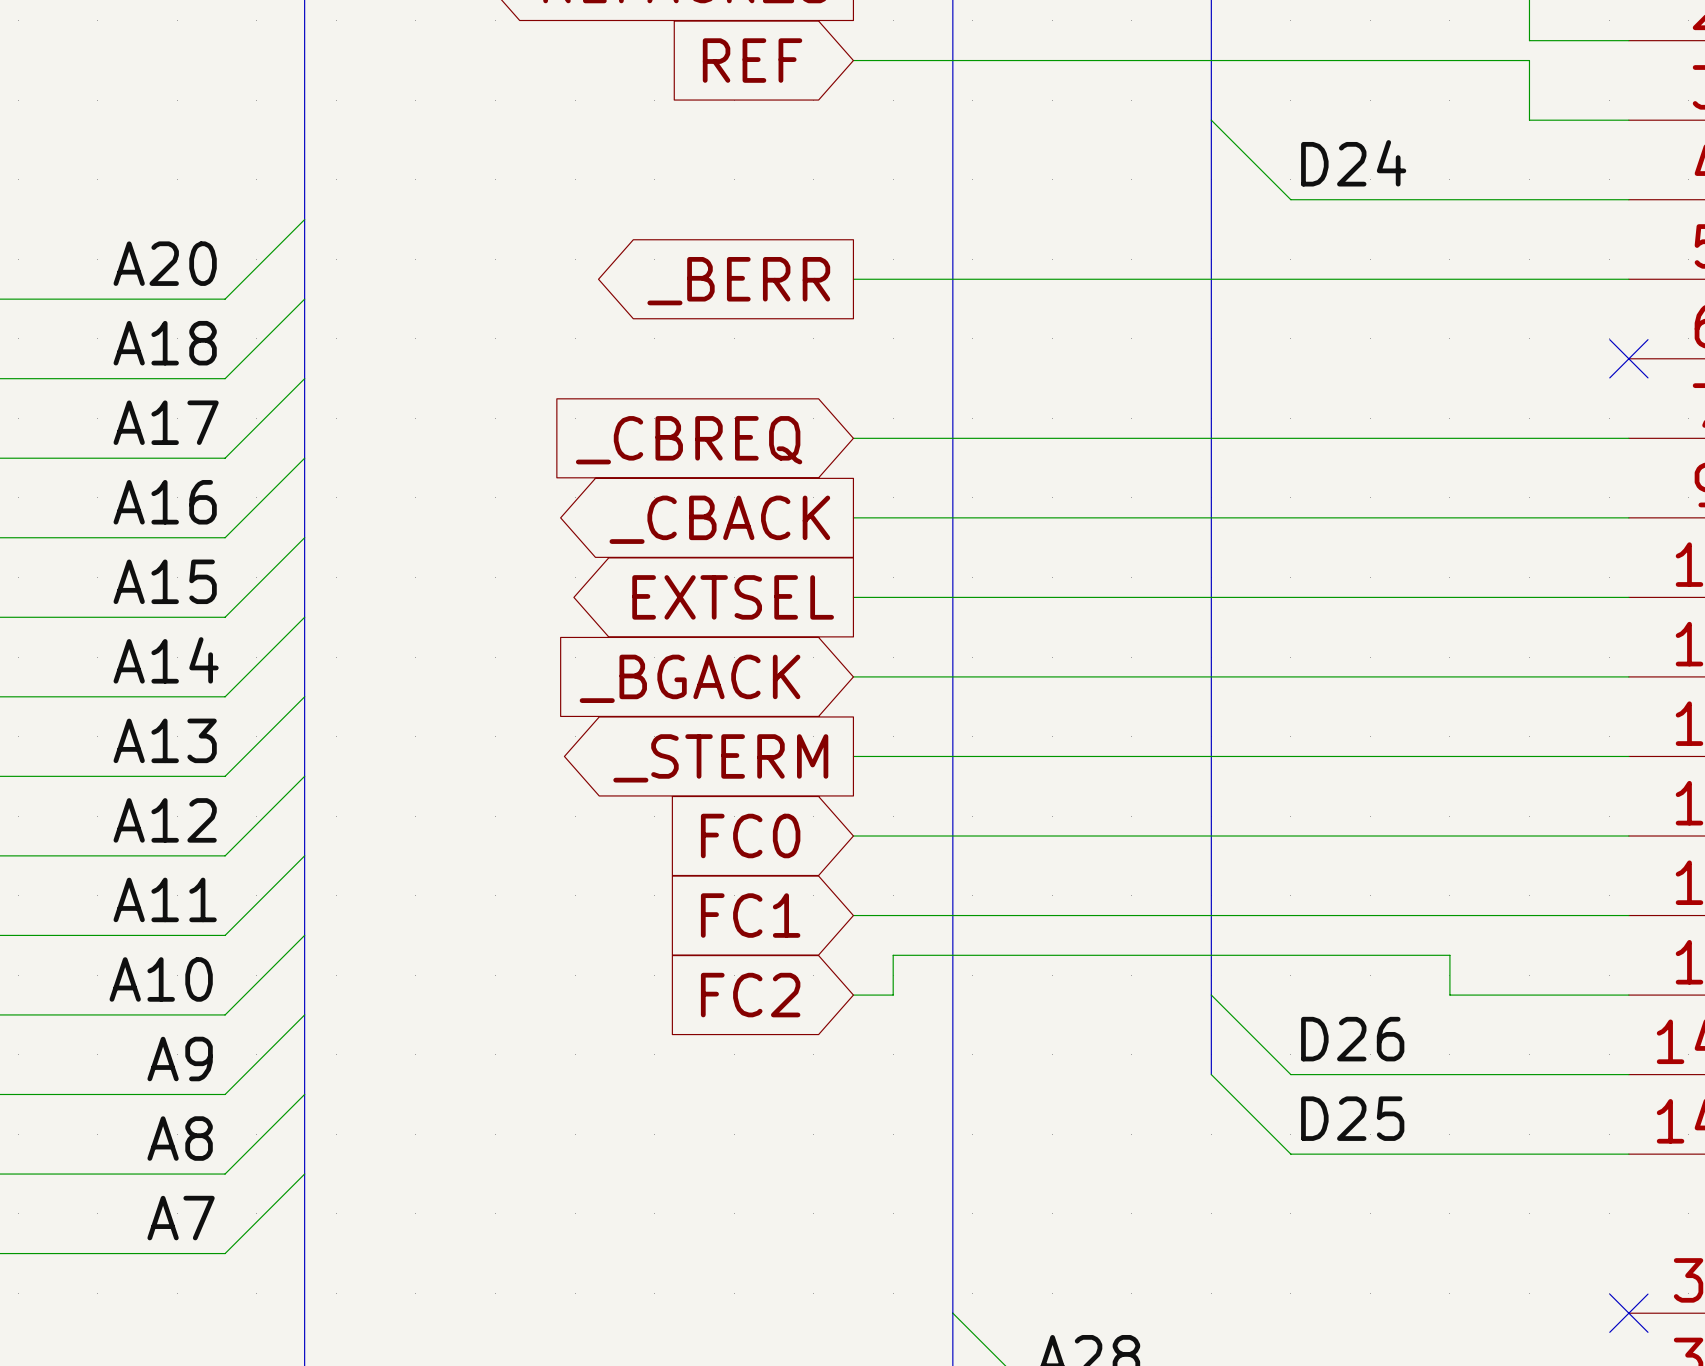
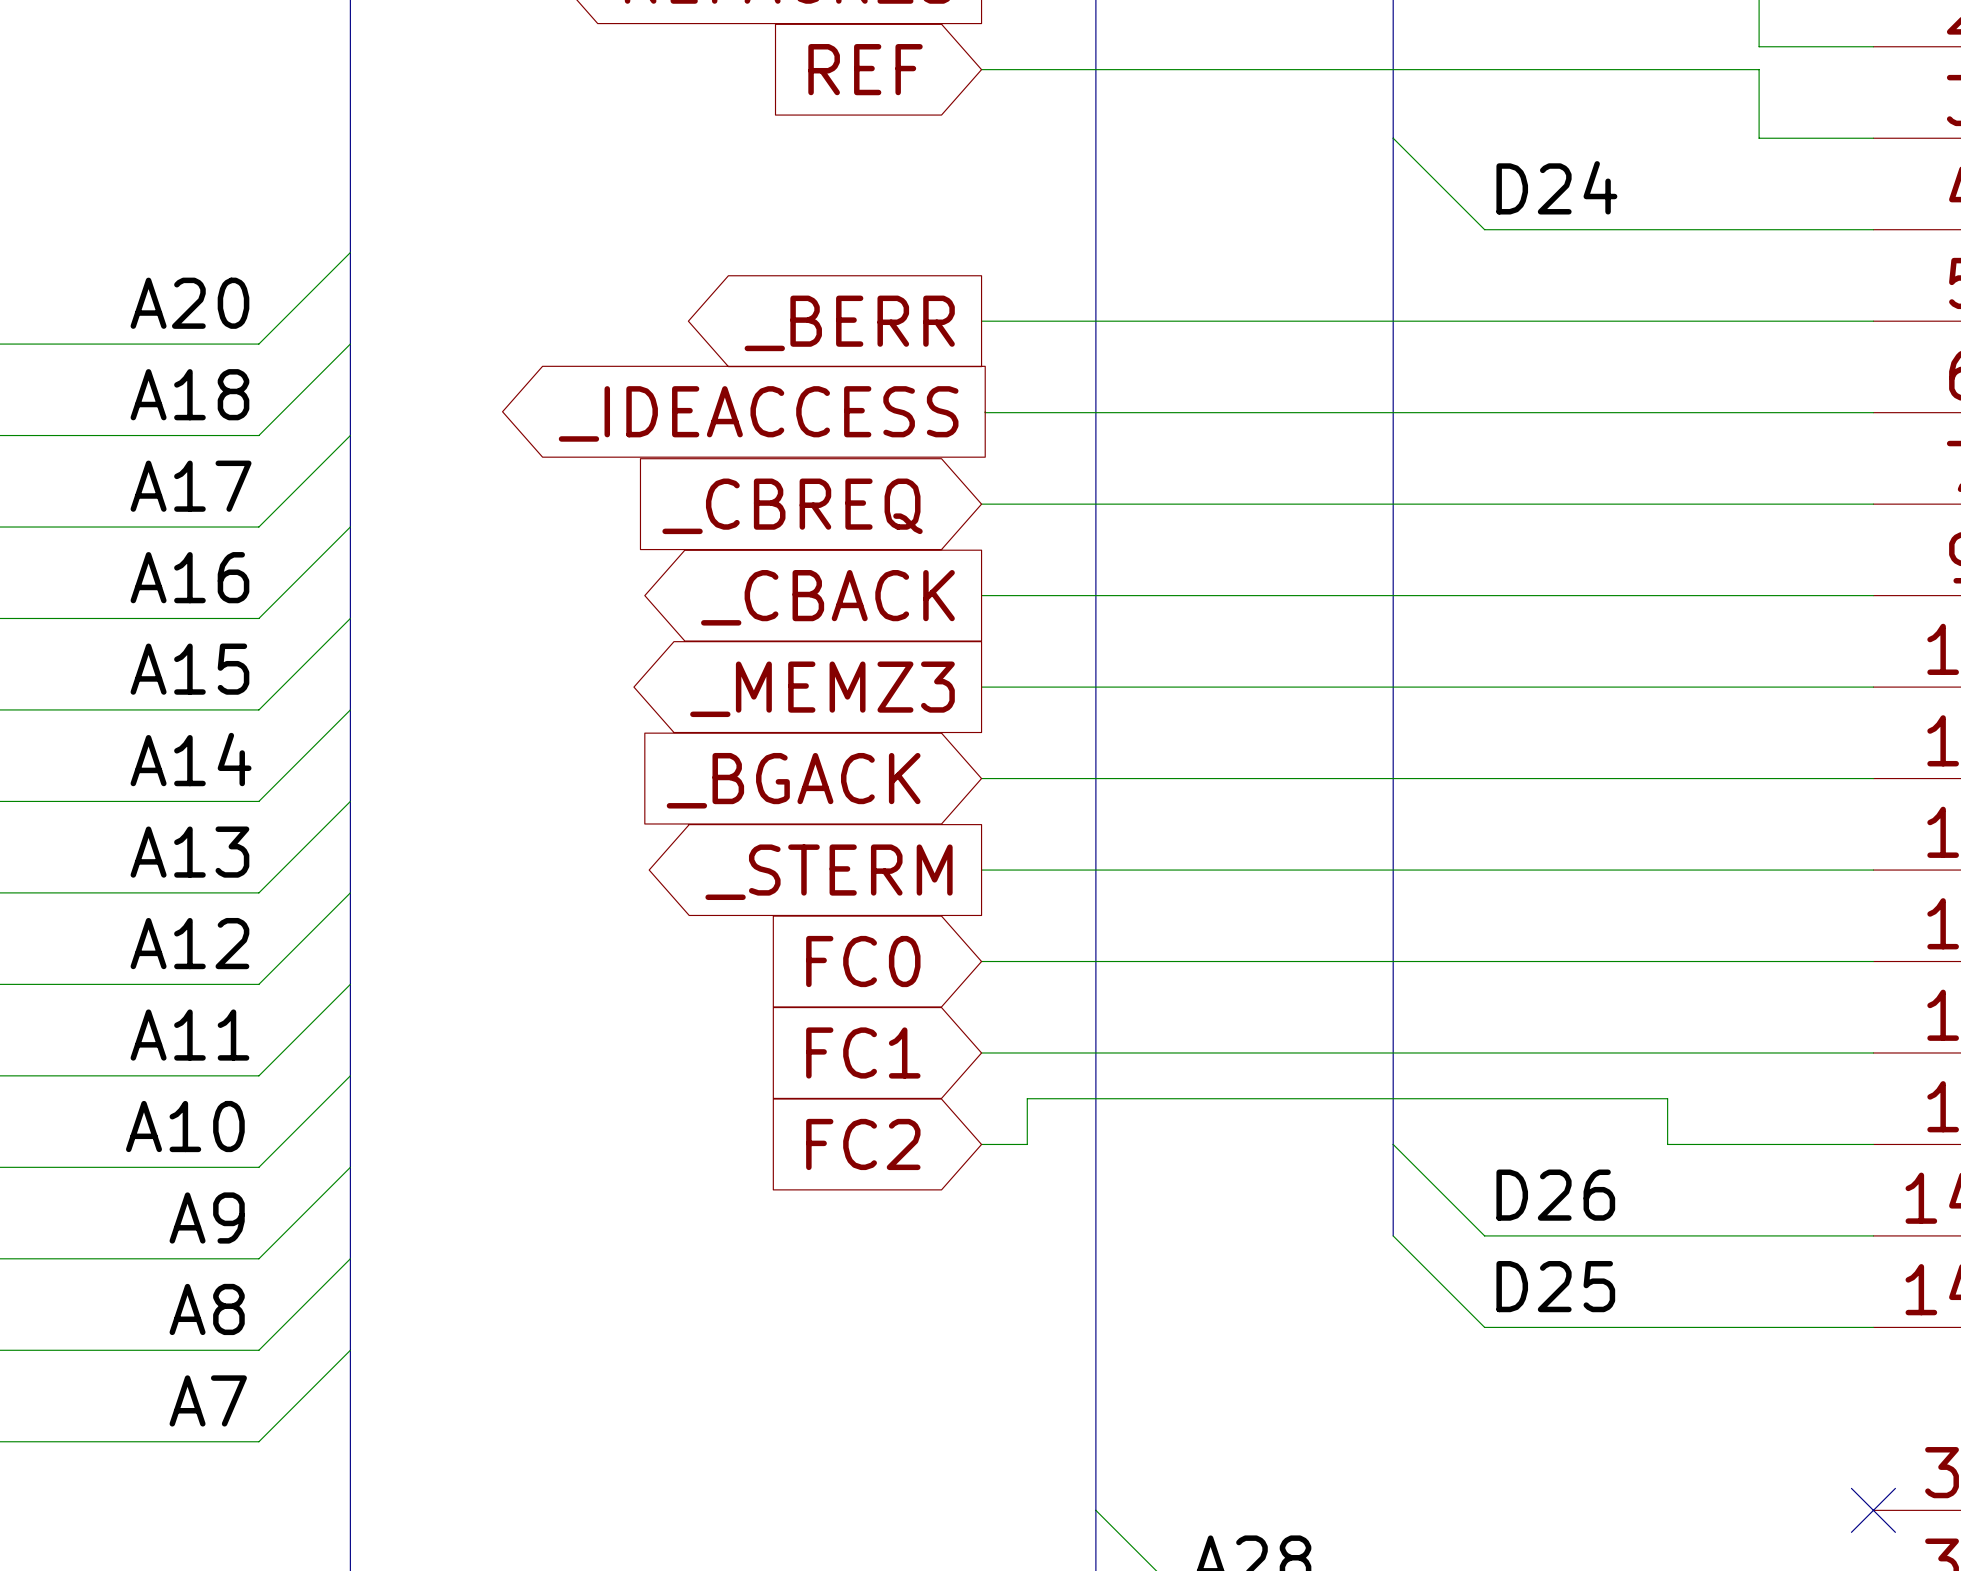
wire: none -> (985, 411) (1873, 412)
no-connect mark: (1628, 358) -> none
global label: none -> _IDEACCESS (758, 413)
global label: EXTSEL (733, 597) -> _MEMZ3 (822, 689)

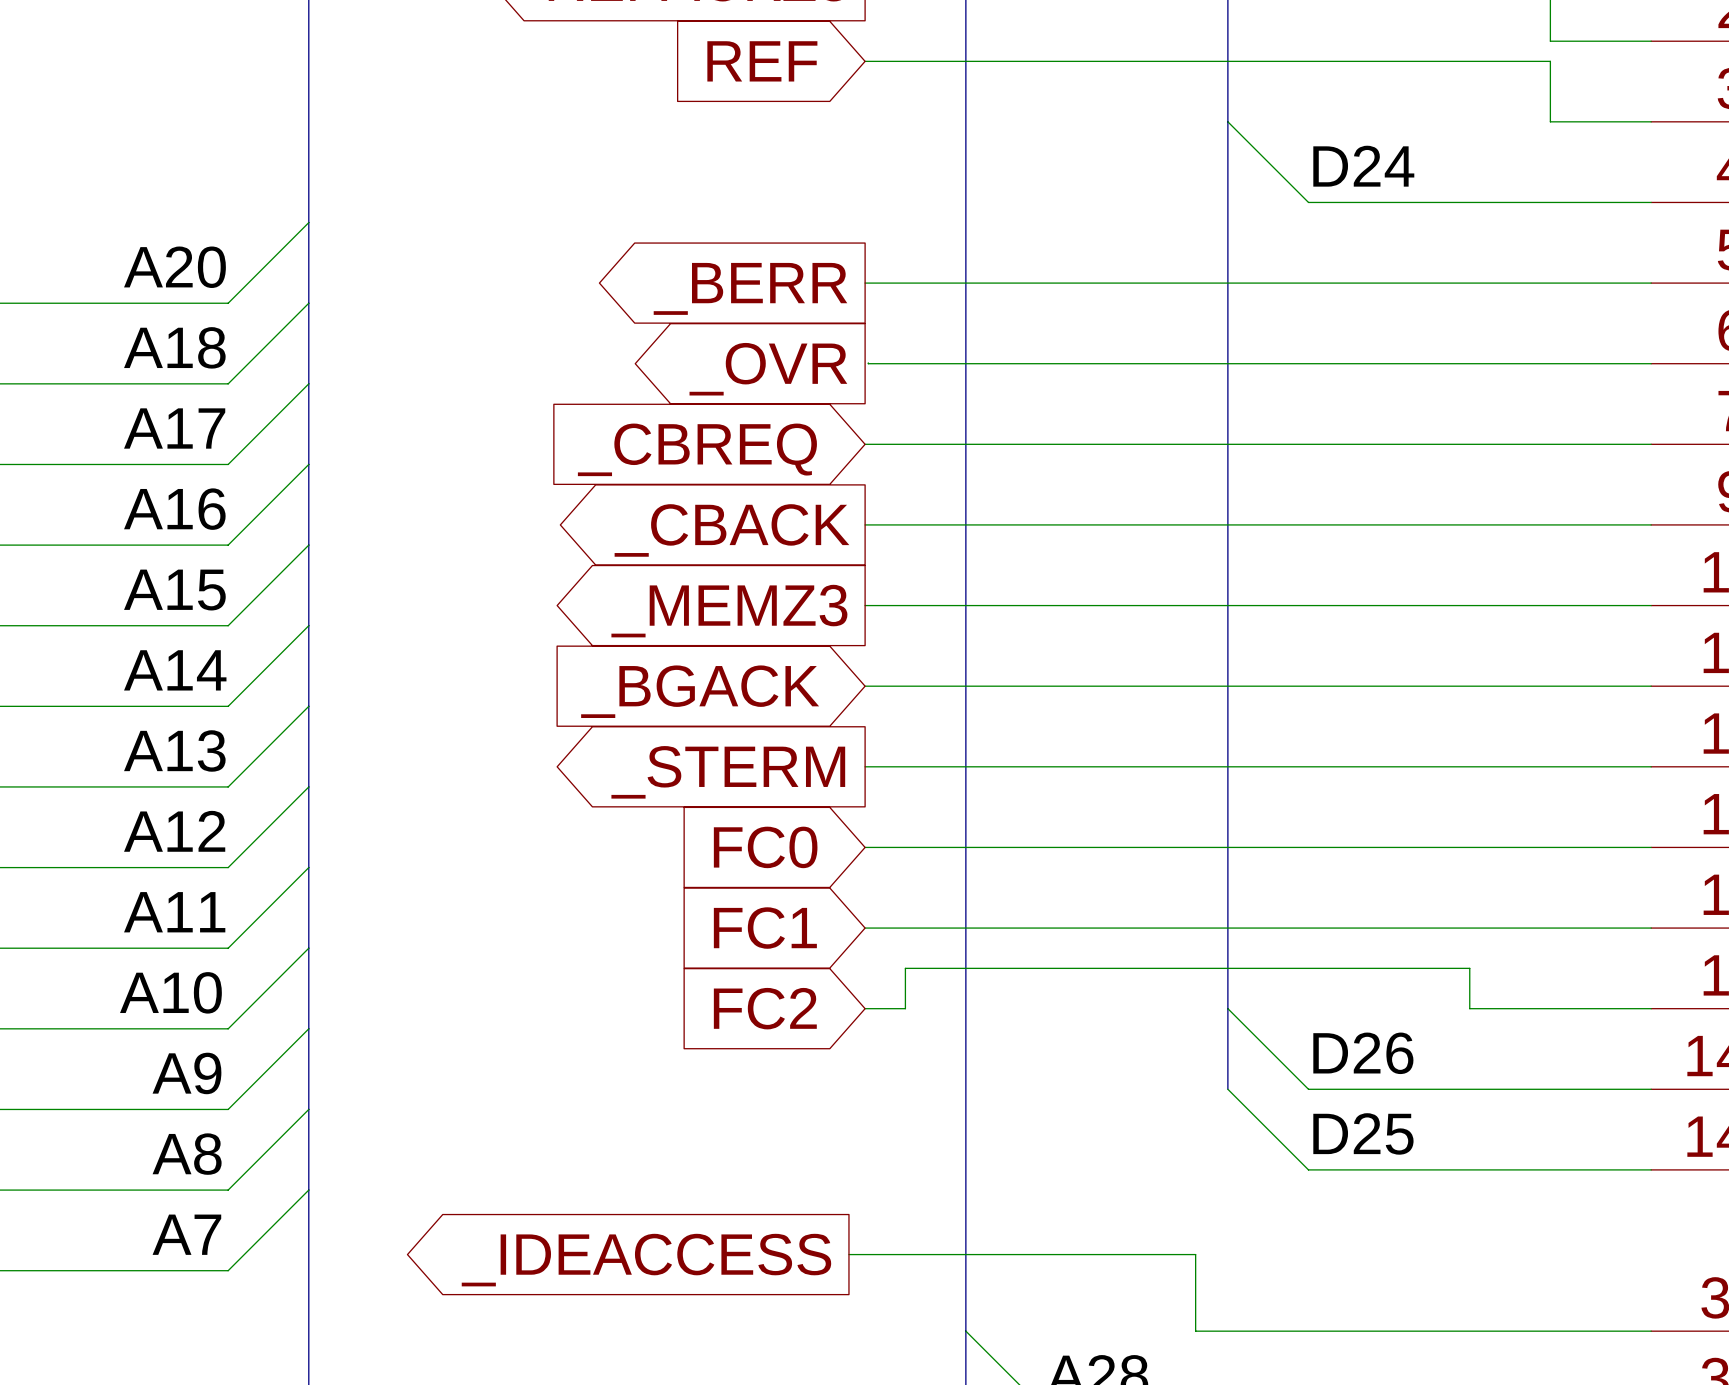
global label: _IDEACCESS (758, 413) -> _OVR (768, 369)
wire: none -> (848, 1254) (1195, 1254) (1195, 1331) (1651, 1331)
global label: none -> _IDEACCESS (646, 1260)
no-connect mark: (1873, 1510) -> none

